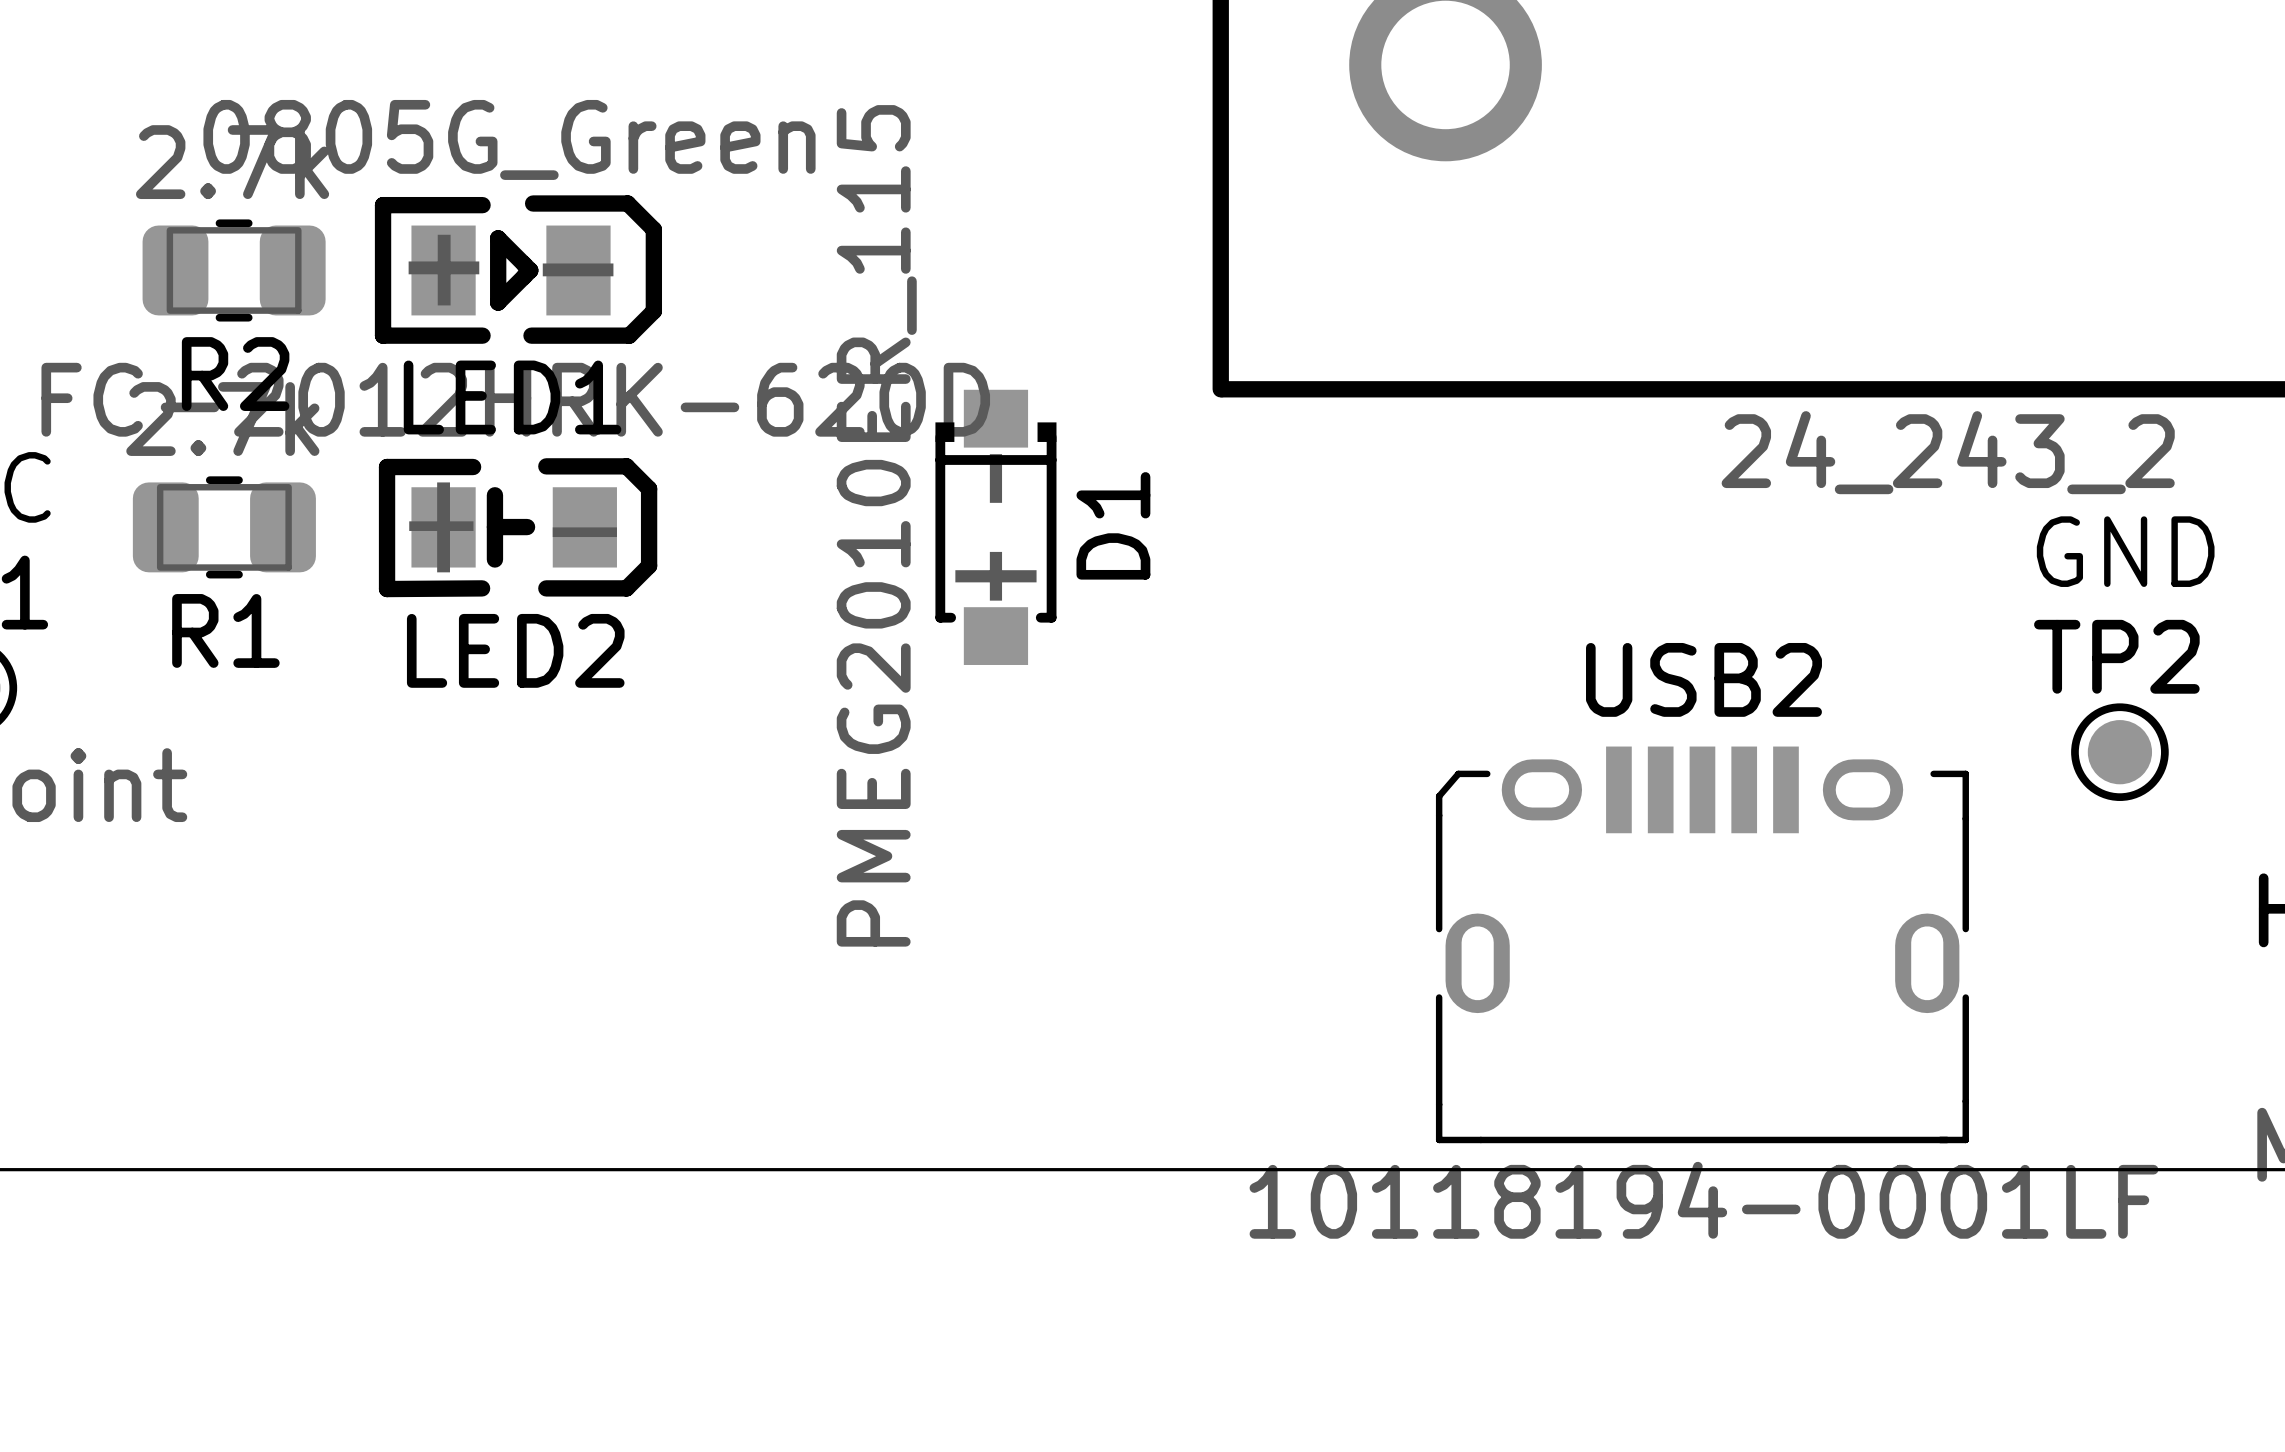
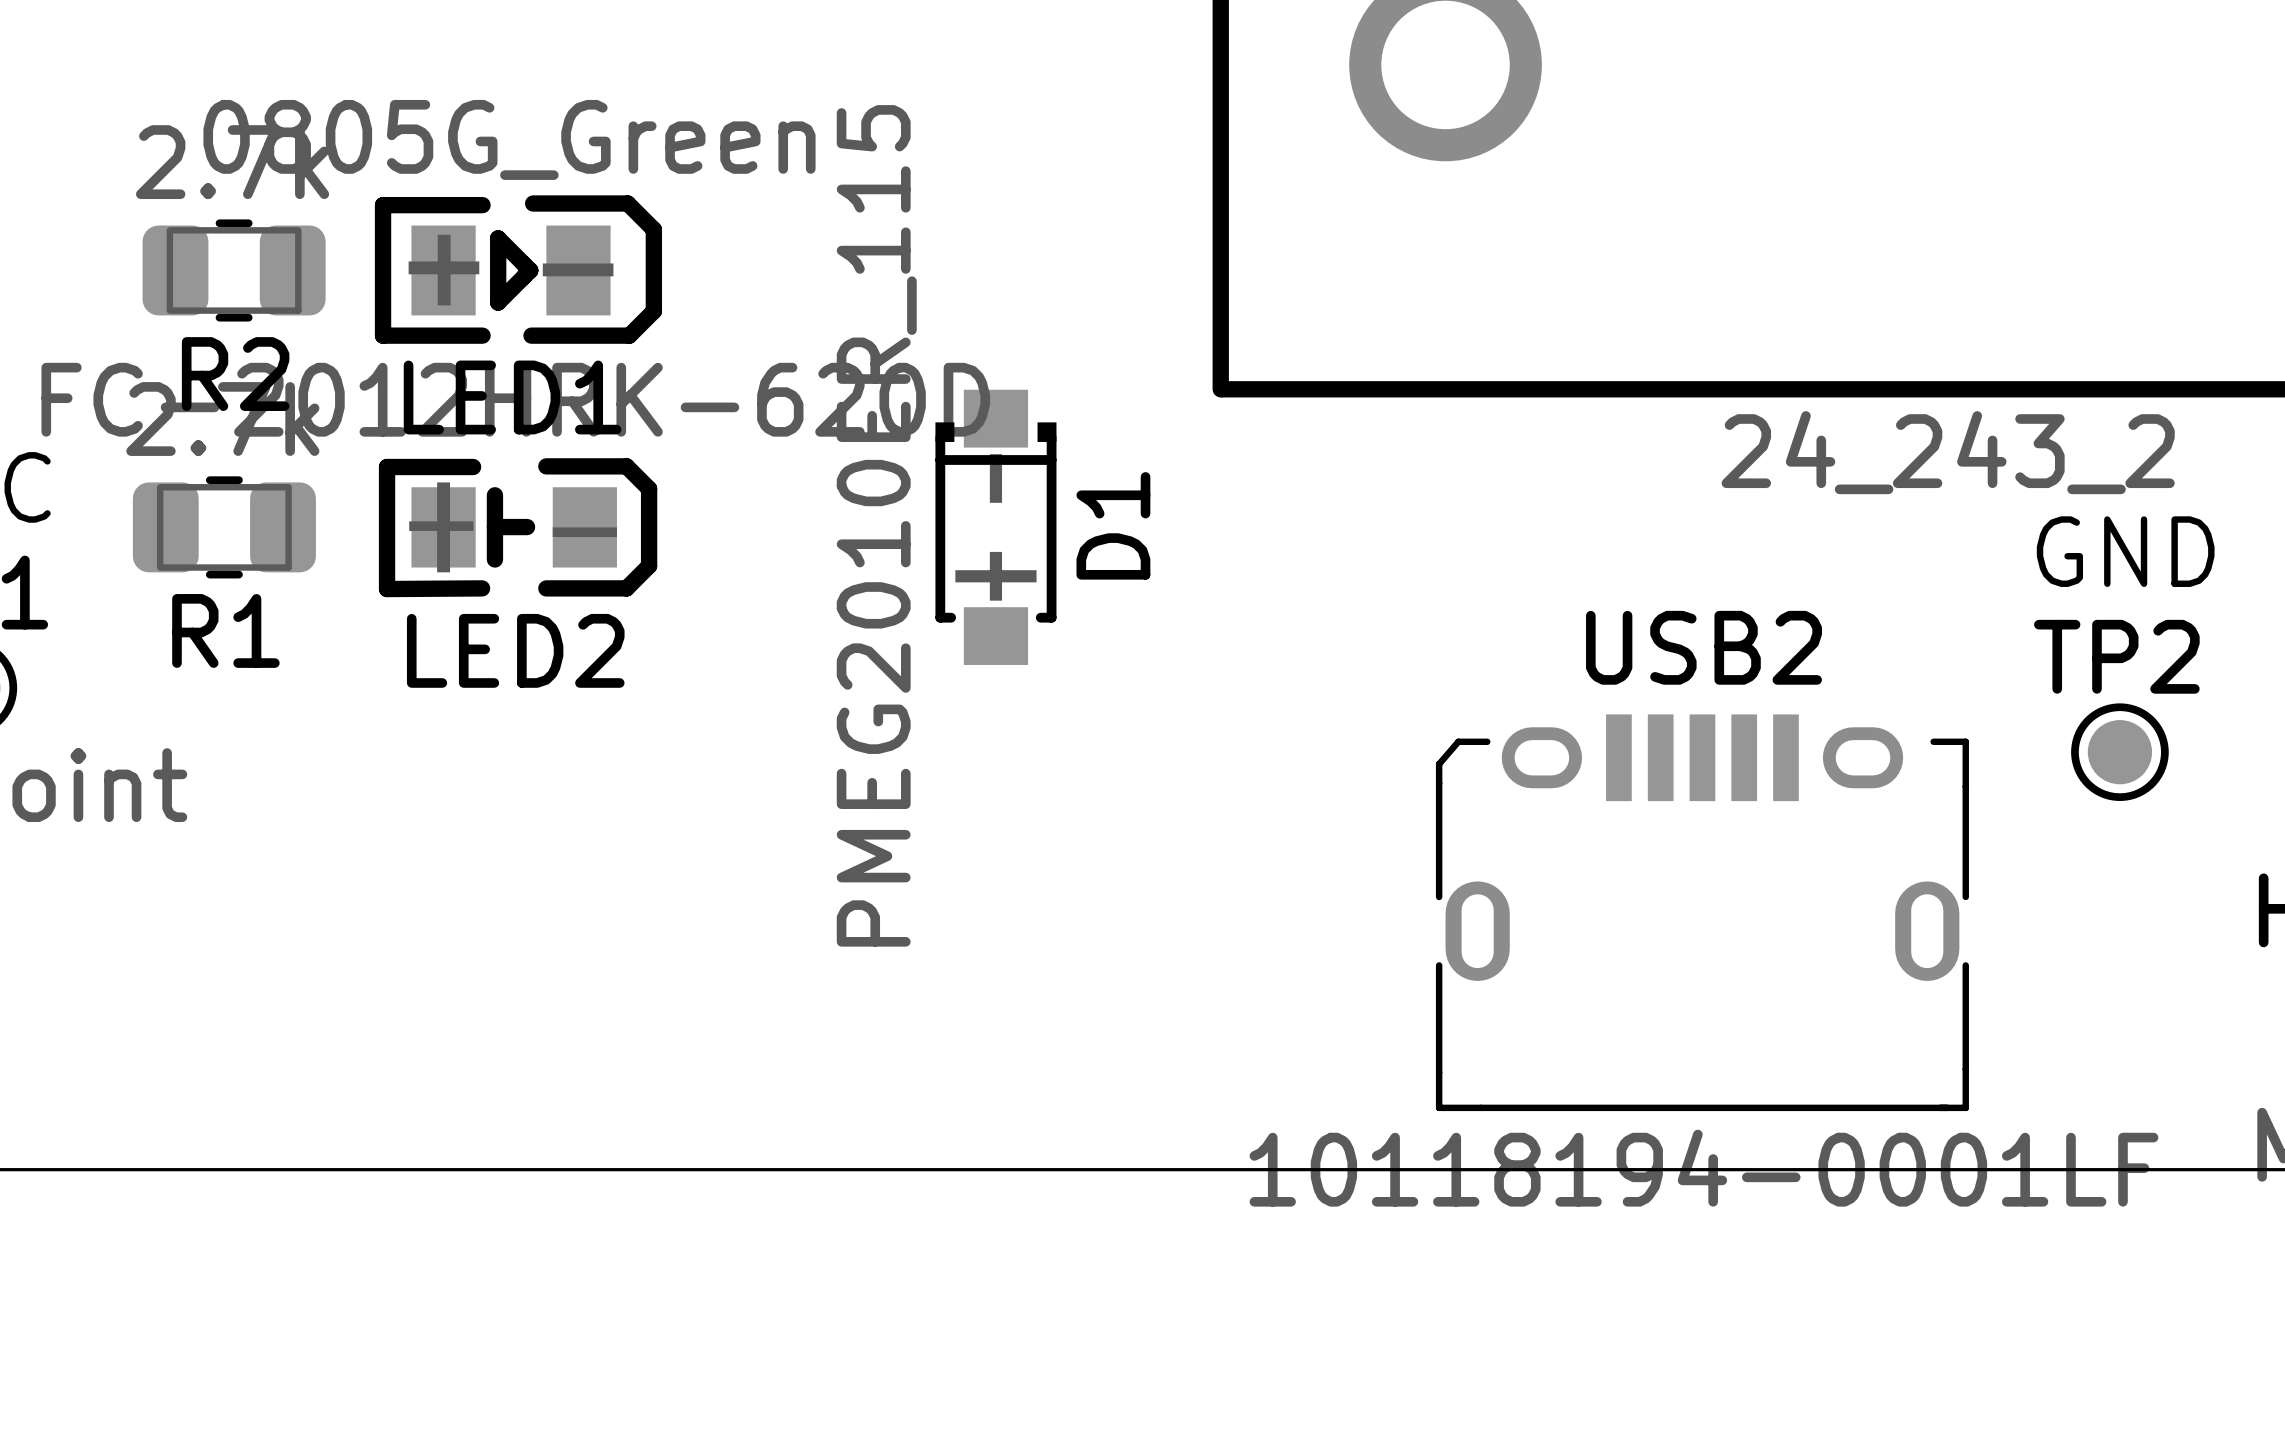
USB2 position: (1702, 944) -> (1702, 912)

